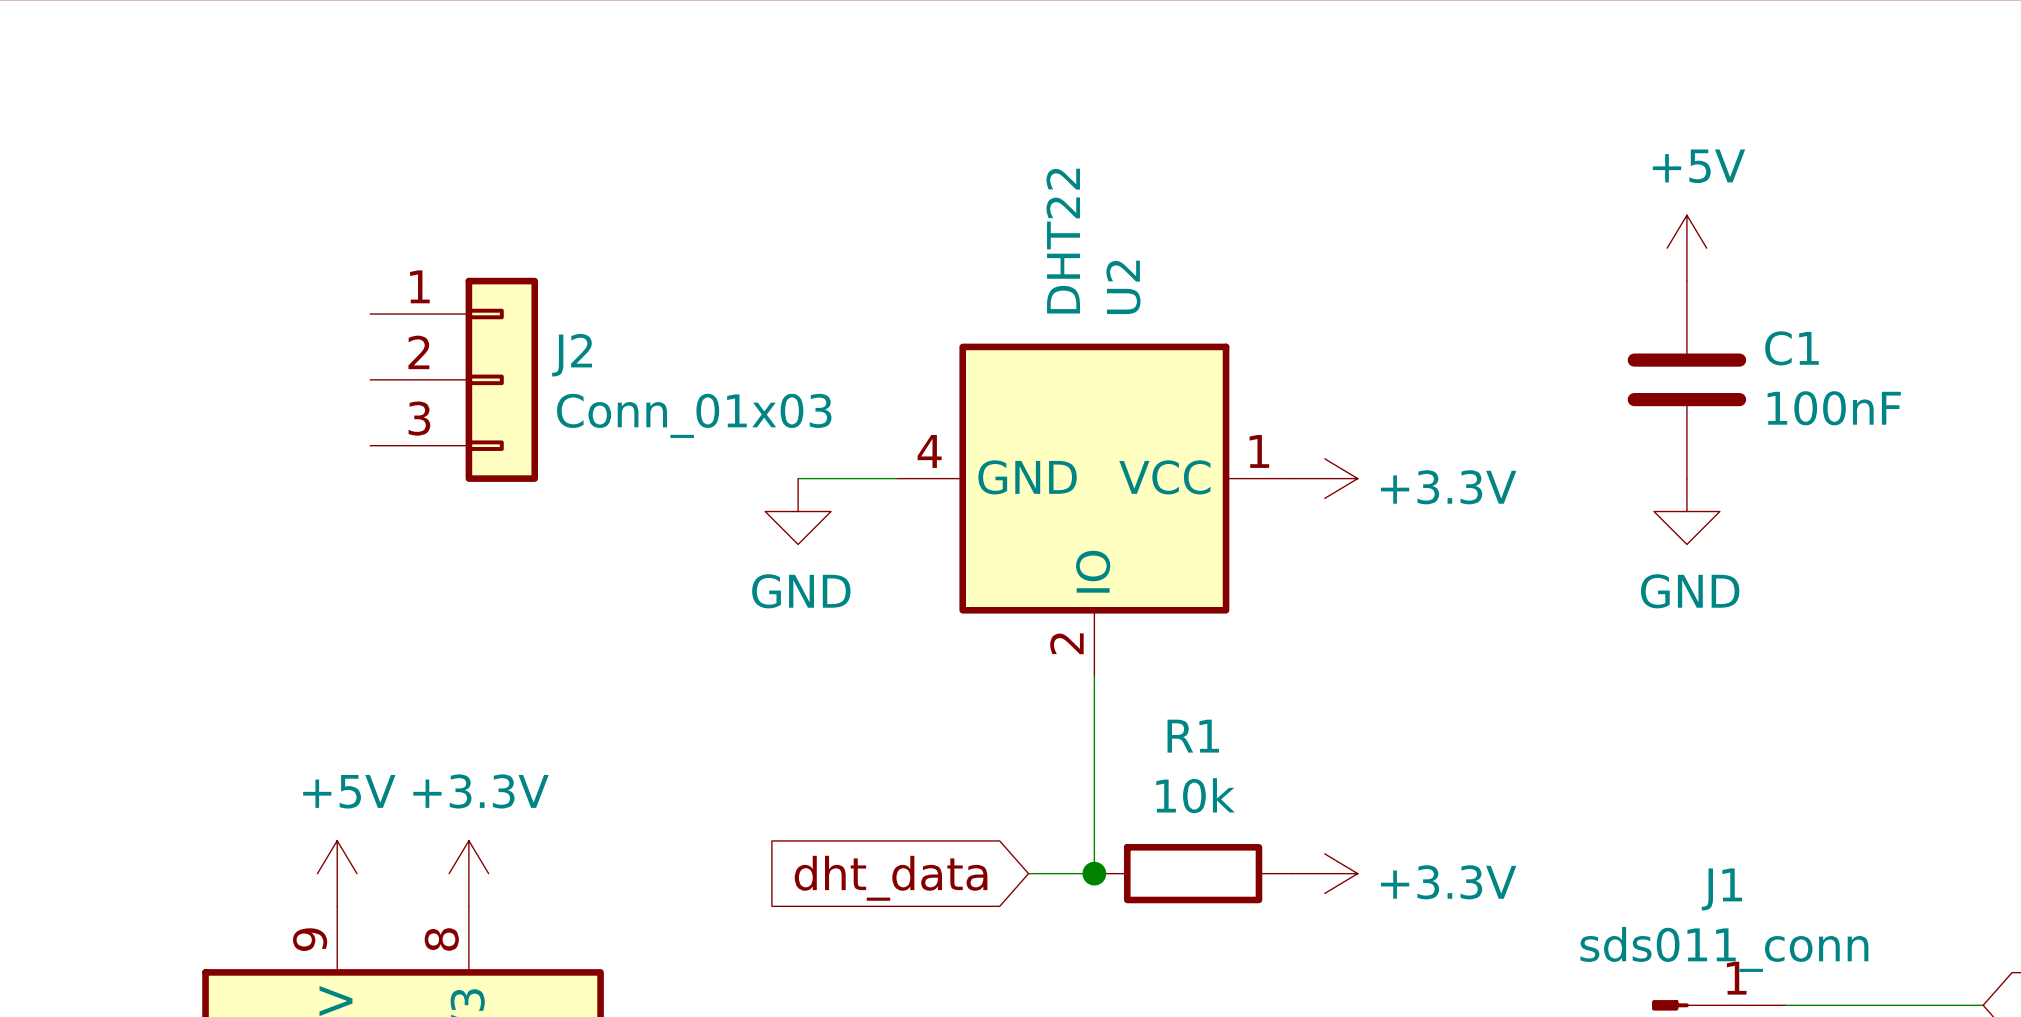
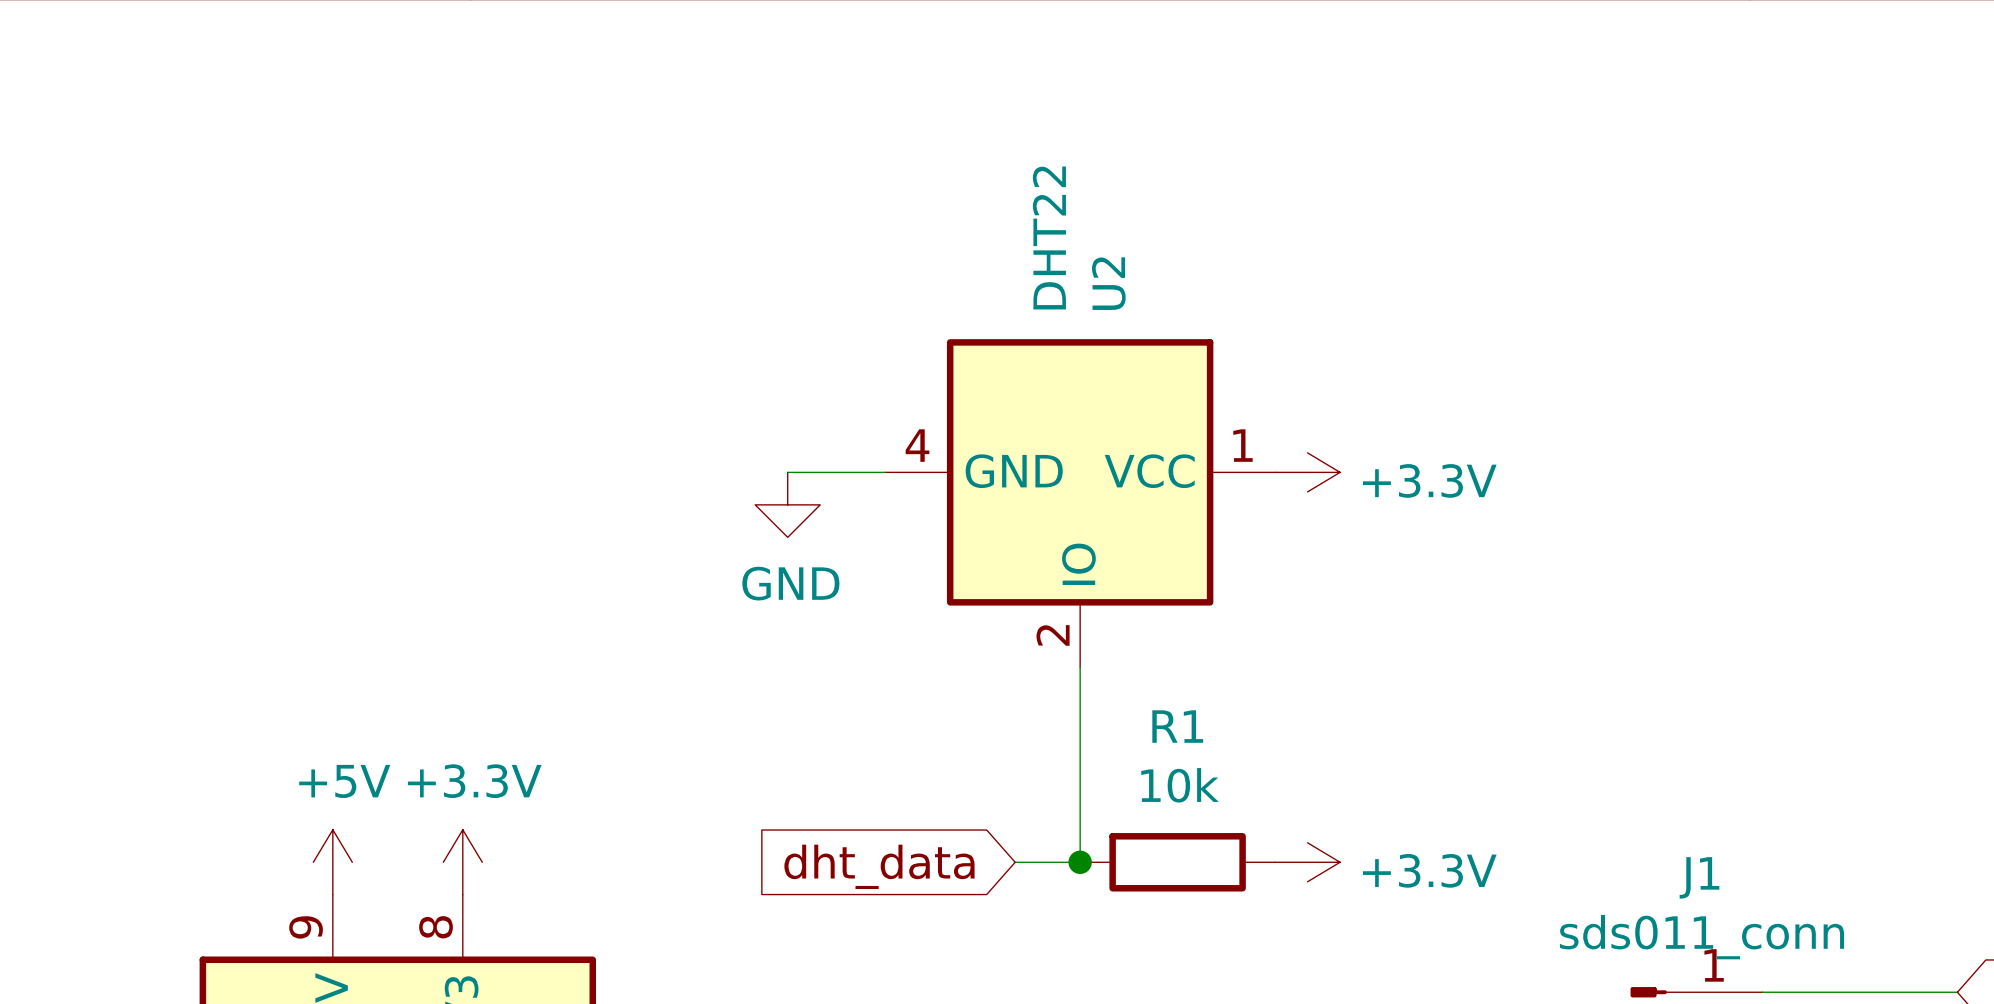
power symbol: +5V (1686, 248) -> none
J2: Conn_01x03 (454, 379) -> none
C1: 100nF (1686, 379) -> none
power symbol: GND (1686, 511) -> none

